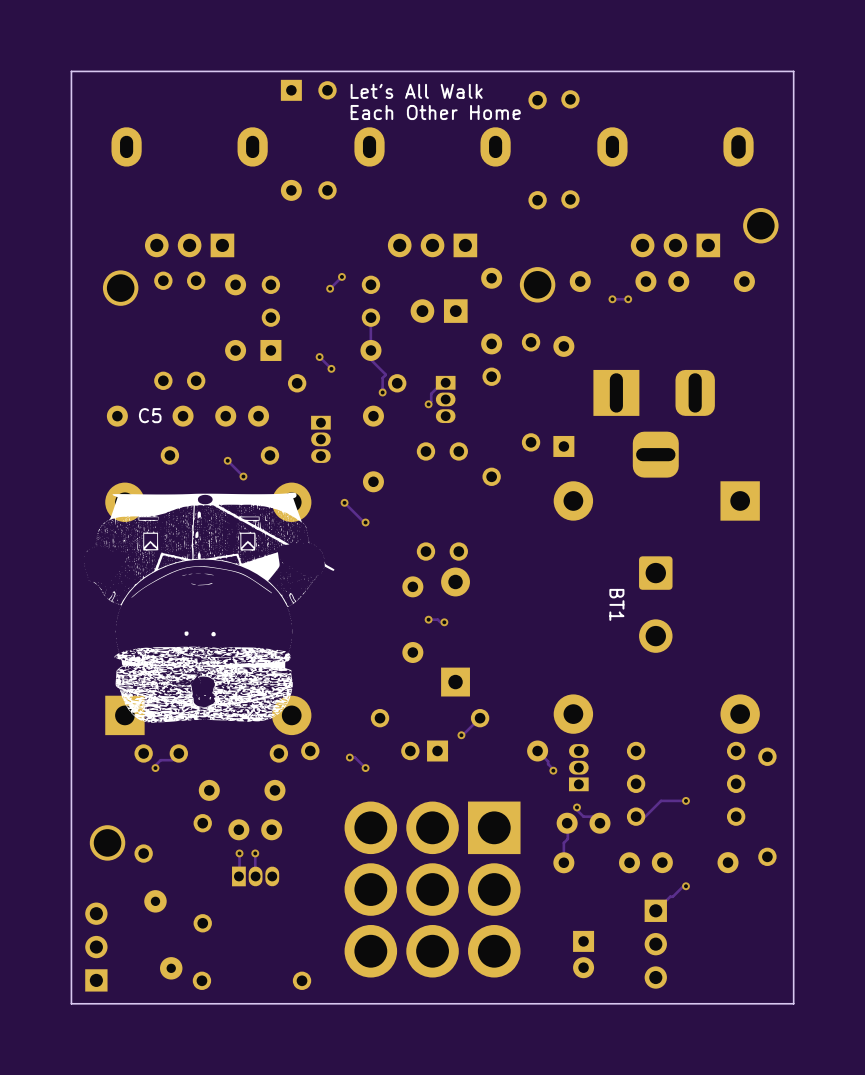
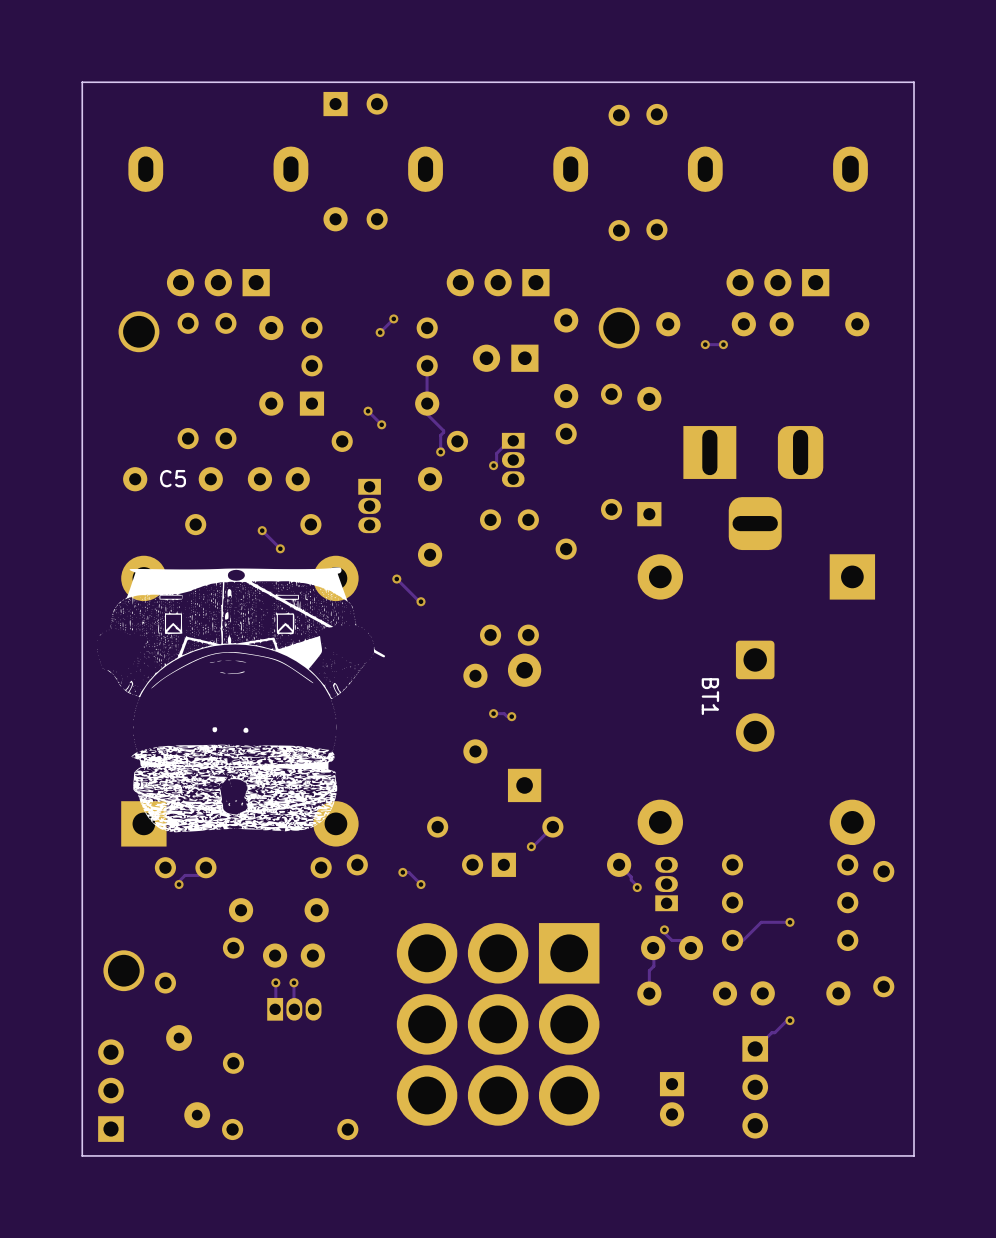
text: Let's All Walk (416, 91) -> none
text: Each Other Home (435, 112) -> none
part: (760, 225) -> none

